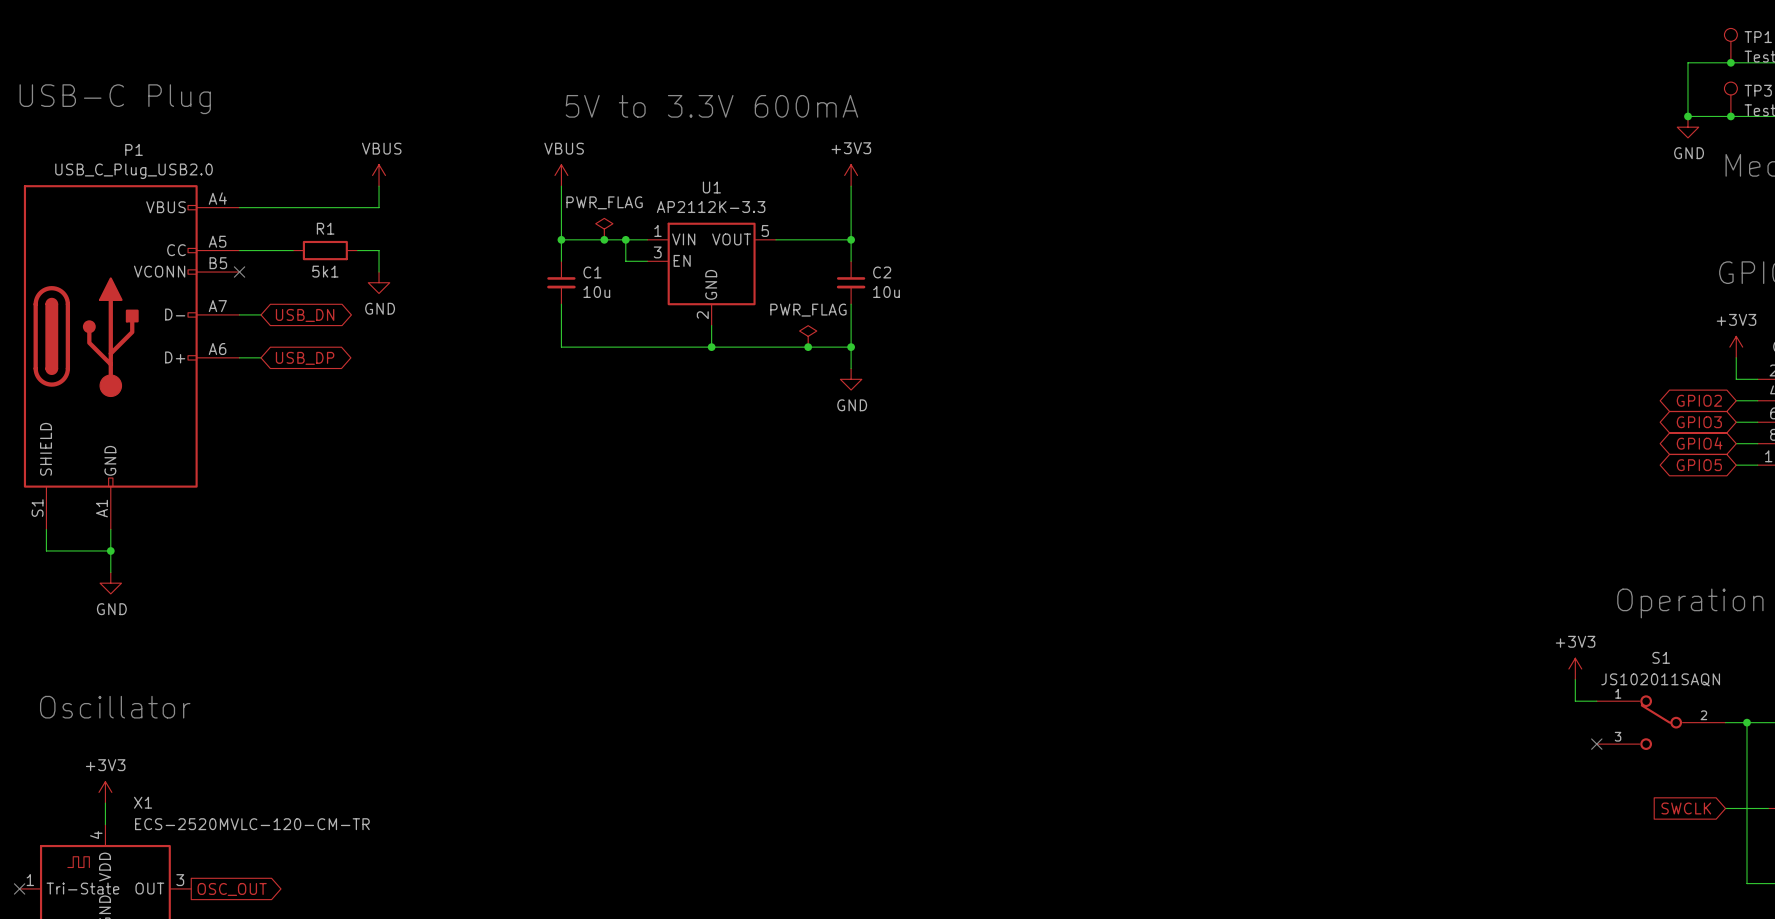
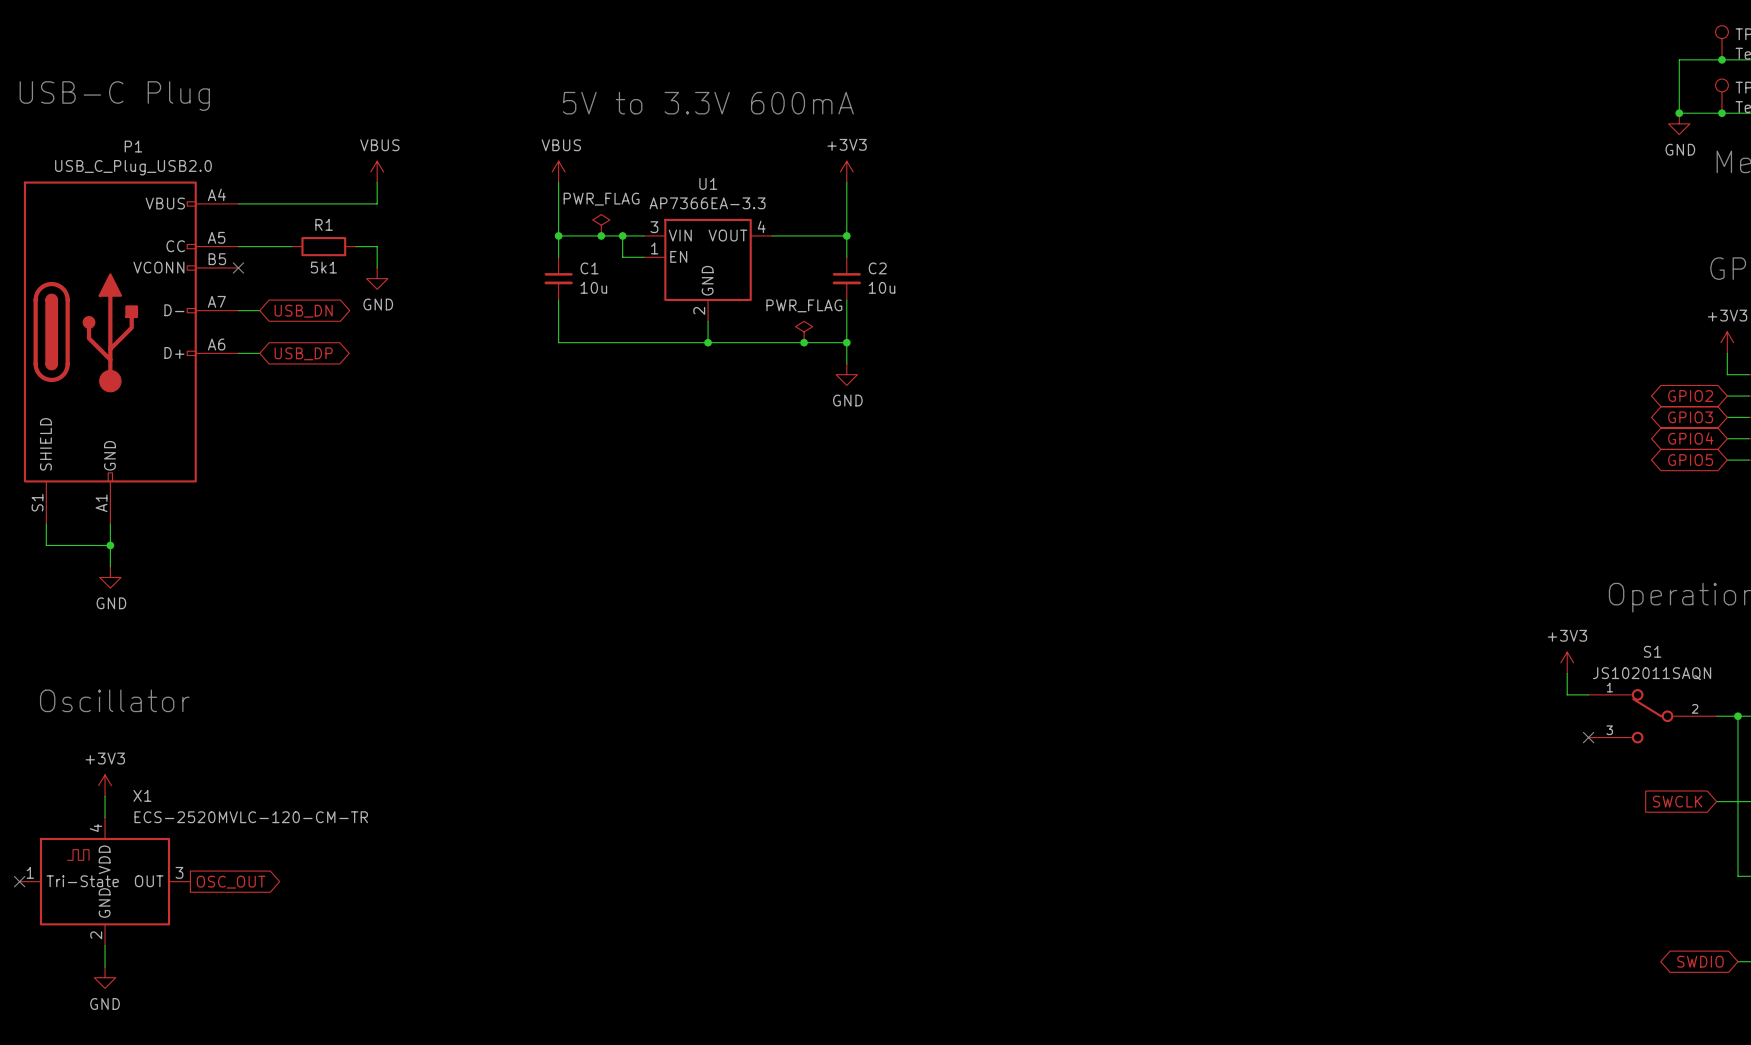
U1 value: AP2112K-3.3 (711, 207) -> AP7366EA-3.3 (707, 203)
U1 pin number: 1 (657, 230) -> 3 (654, 227)
U1 pin number: 5 (765, 230) -> 4 (761, 226)
U1 pin number: 3 (657, 252) -> 1 (654, 248)

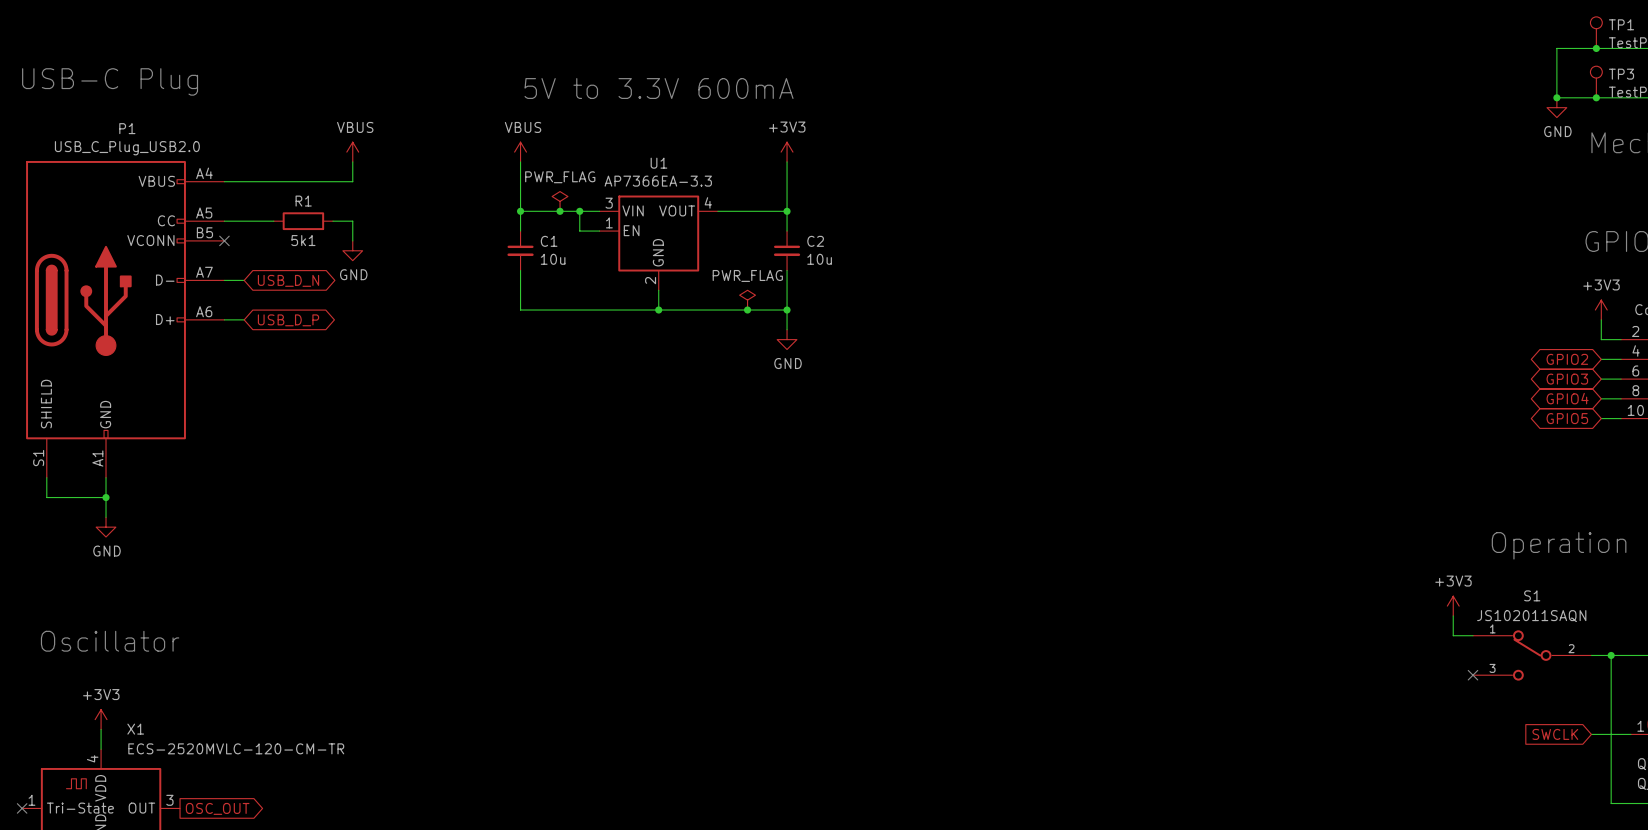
global label: USB_DN (303, 311) -> USB_D_N (288, 280)
global label: USB_DP (303, 353) -> USB_D_P (288, 320)

